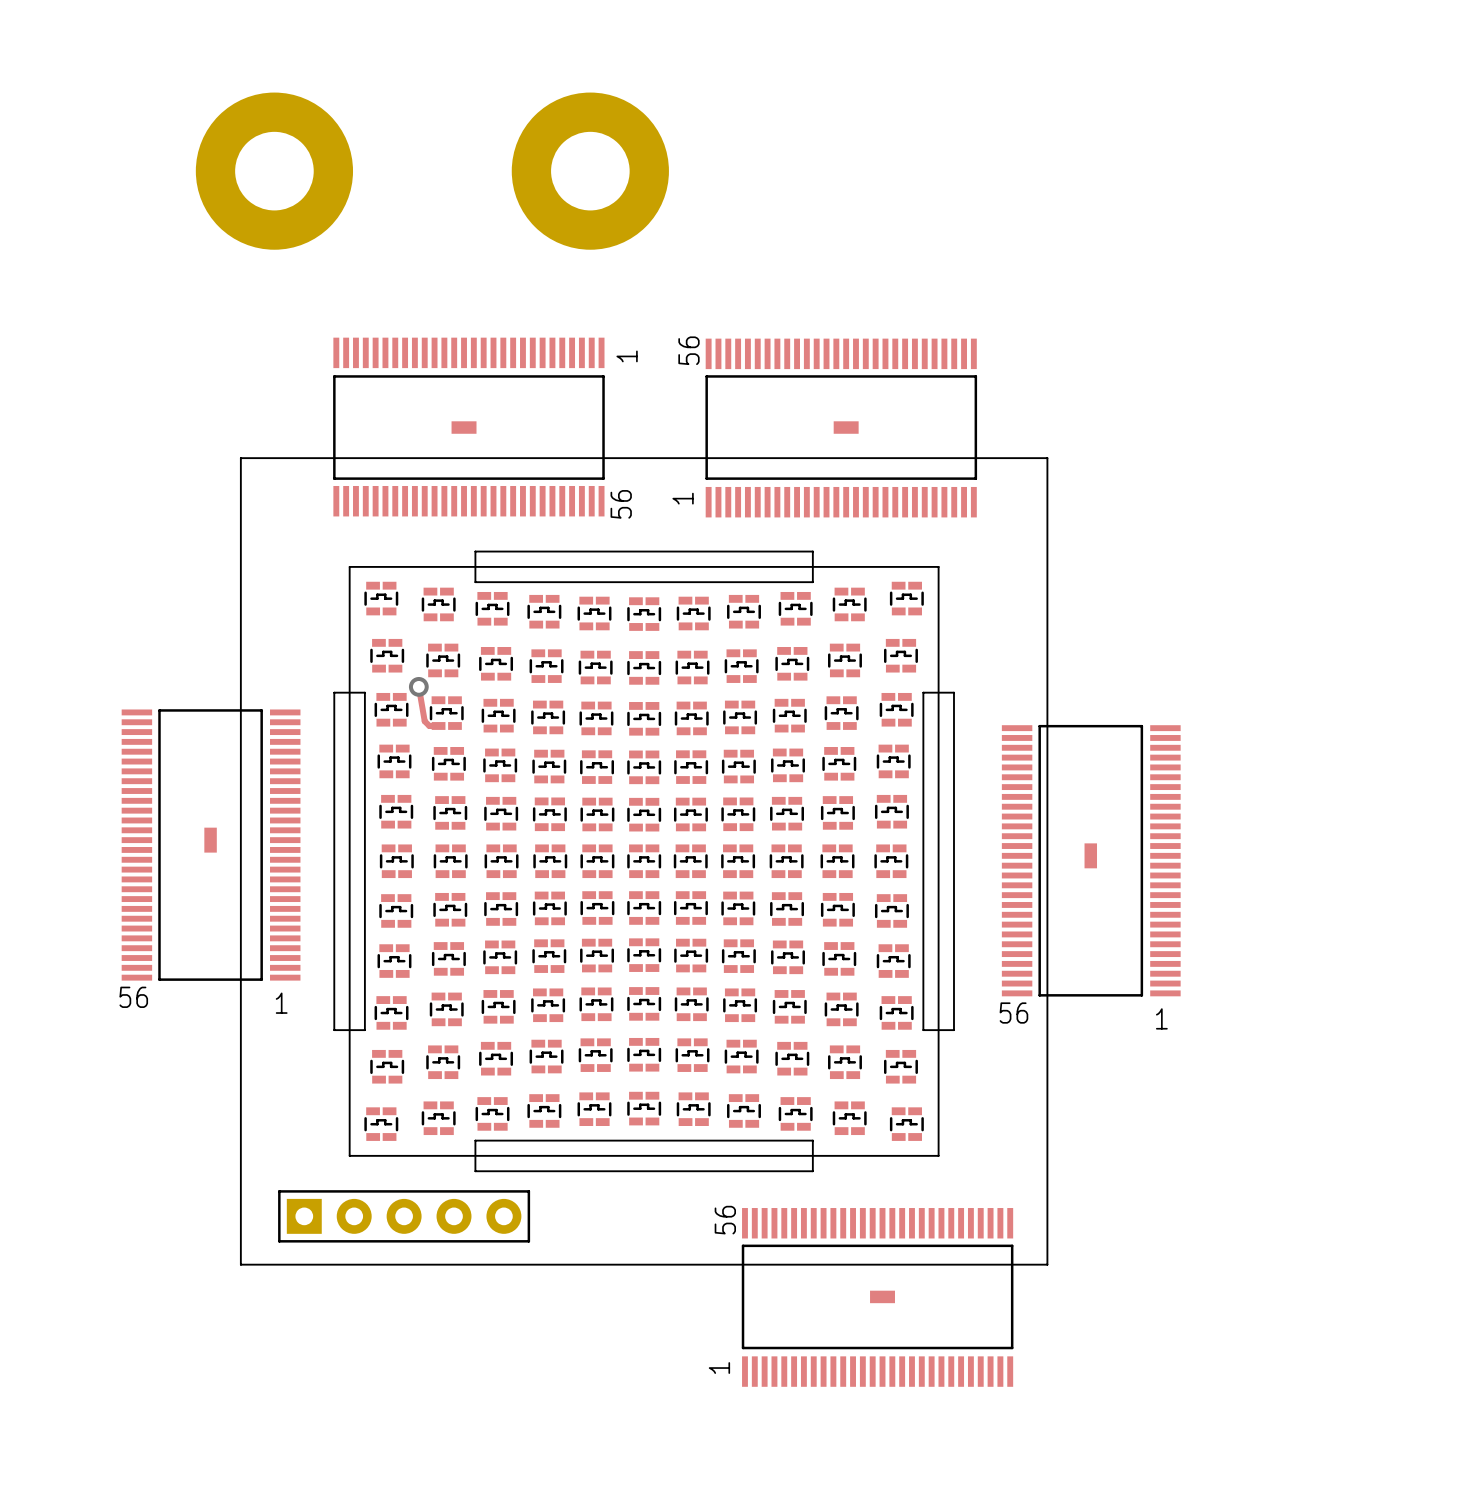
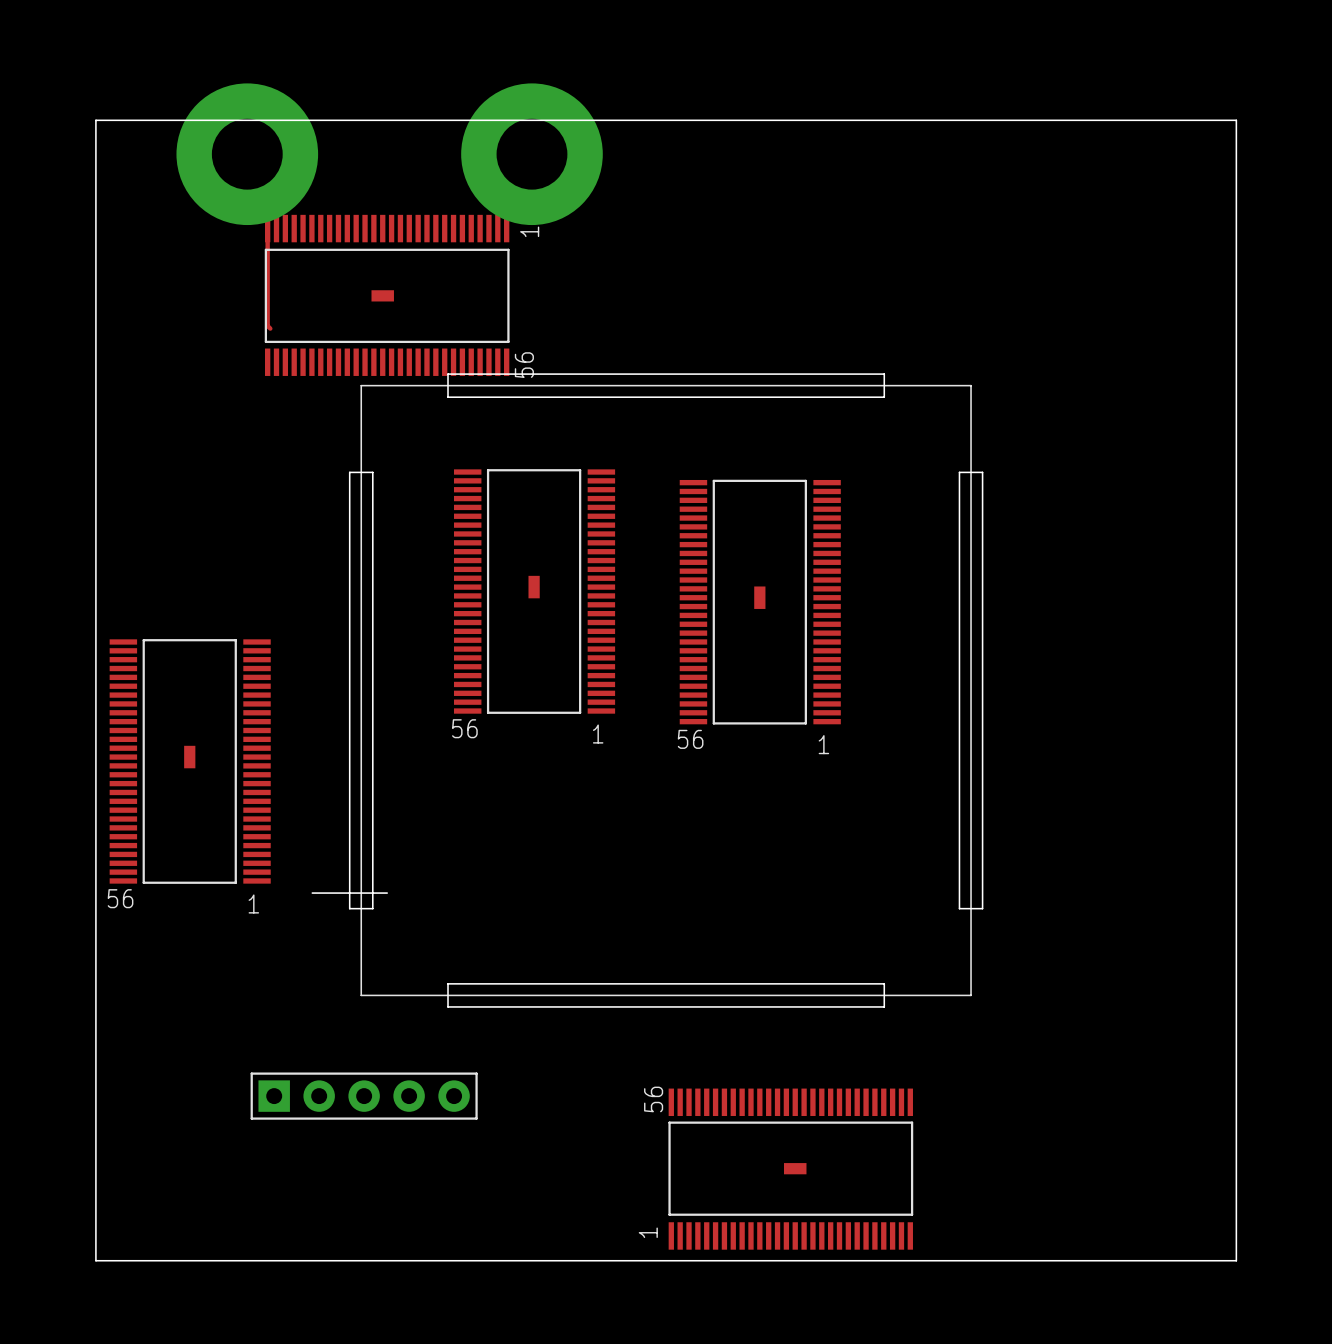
board edge: none -> (95, 120) (1236, 120) (1236, 1260) (95, 1260) (95, 120)
track: none -> (267, 228) (267, 325) (270, 328)
board edge: none -> (448, 374) (884, 374) (884, 397) (448, 397) (448, 374)
part position: (468, 427) -> (387, 295)
part: (841, 428) -> none
board edge: (240, 458) (1047, 458) (1047, 1264) (240, 1264) (240, 458) -> none
board edge: none -> (349, 472) (372, 472) (372, 908) (349, 908) (349, 472)
board edge: none -> (959, 472) (982, 472) (982, 908) (959, 908) (959, 472)
board edge: (475, 551) (812, 551) (812, 582) (475, 582) (475, 551) -> none
line: (349, 566) (938, 566) (938, 1155) (349, 1155) (349, 566) -> (361, 385) (361, 995) (971, 995) (971, 385) (361, 385)
part: (381, 598) -> none
part: (906, 598) -> none
part: (438, 604) -> none
part: (849, 604) -> none
part: (492, 608) -> none
part: (795, 608) -> none
part: (544, 611) -> none
part: (743, 611) -> none
part: (594, 613) -> none
part: (693, 613) -> none
part: (644, 614) -> none
part footprint: [828, 643, 862, 678] -> [679, 479, 841, 725]
part footprint: [578, 650, 613, 685] -> [453, 469, 616, 714]
part: (387, 655) -> none
part: (900, 655) -> none
part: (443, 660) -> none
part: (496, 663) -> none
part: (792, 663) -> none
part: (546, 666) -> none
part: (741, 666) -> none
part: (644, 667) -> none
part: (692, 667) -> none
track: (418, 686) (424, 721) (429, 725) (438, 725) -> none
via: (418, 686) -> none
board edge: (334, 692) (364, 692) (364, 1030) (334, 1030) (334, 692) -> none
board edge: (923, 692) (953, 692) (953, 1030) (923, 1030) (923, 692) -> none
part: (391, 709) -> none
part: (896, 709) -> none
part: (446, 713) -> none
part: (841, 713) -> none
part: (498, 715) -> none
part: (789, 715) -> none
part: (548, 717) -> none
part: (740, 717) -> none
part: (596, 718) -> none
part: (644, 718) -> none
part: (691, 718) -> none
part: (394, 761) -> none
part: (893, 761) -> none
part: (448, 763) -> none
part: (839, 763) -> none
part: (500, 765) -> none
part: (788, 765) -> none
part: (549, 766) -> none
part: (738, 766) -> none
part: (597, 767) -> none
part: (644, 767) -> none
part: (691, 767) -> none
part: (396, 811) -> none
part: (891, 811) -> none
part: (450, 812) -> none
part: (837, 812) -> none
part: (501, 813) -> none
part: (787, 813) -> none
part: (549, 814) -> none
part: (597, 814) -> none
part: (644, 814) -> none
part: (690, 814) -> none
part: (738, 814) -> none
part: (1091, 860) -> none
part: (396, 861) -> none
part: (450, 861) -> none
part: (501, 861) -> none
part: (550, 861) -> none
part: (597, 861) -> none
part: (644, 861) -> none
part: (690, 861) -> none
part: (738, 861) -> none
part: (786, 861) -> none
part: (837, 861) -> none
part: (891, 861) -> none
part: (501, 908) -> none
part: (549, 908) -> none
part: (597, 908) -> none
part: (644, 908) -> none
part: (690, 908) -> none
part: (738, 908) -> none
part: (787, 908) -> none
part: (450, 909) -> none
part: (837, 909) -> none
part: (396, 910) -> none
part: (891, 910) -> none
part: (597, 955) -> none
part: (644, 955) -> none
part: (691, 955) -> none
part: (549, 956) -> none
part: (738, 956) -> none
part: (500, 957) -> none
part: (788, 957) -> none
part: (448, 958) -> none
part: (839, 958) -> none
part: (394, 961) -> none
part: (893, 961) -> none
board edge: none -> (312, 893) (387, 893)
part: (644, 1003) -> none
part: (596, 1004) -> none
part: (691, 1004) -> none
part: (548, 1005) -> none
part: (740, 1005) -> none
part: (498, 1006) -> none
part: (789, 1006) -> none
part: (446, 1009) -> none
part: (841, 1009) -> none
part: (391, 1012) -> none
part: (896, 1012) -> none
part: (644, 1054) -> none
part: (595, 1055) -> none
part: (692, 1055) -> none
part: (546, 1056) -> none
part: (741, 1056) -> none
part: (496, 1058) -> none
part: (792, 1058) -> none
part: (443, 1062) -> none
part: (844, 1062) -> none
part: (387, 1066) -> none
part: (900, 1066) -> none
board edge: none -> (448, 983) (448, 1006) (884, 1006) (884, 983) (448, 983)
part: (644, 1108) -> none
part: (594, 1109) -> none
part: (693, 1109) -> none
part: (544, 1110) -> none
part: (743, 1110) -> none
part: (492, 1113) -> none
part: (795, 1113) -> none
part: (438, 1118) -> none
part: (849, 1118) -> none
part: (381, 1124) -> none
part: (906, 1124) -> none
board edge: (475, 1140) (475, 1171) (812, 1171) (812, 1140) (475, 1140) -> none

